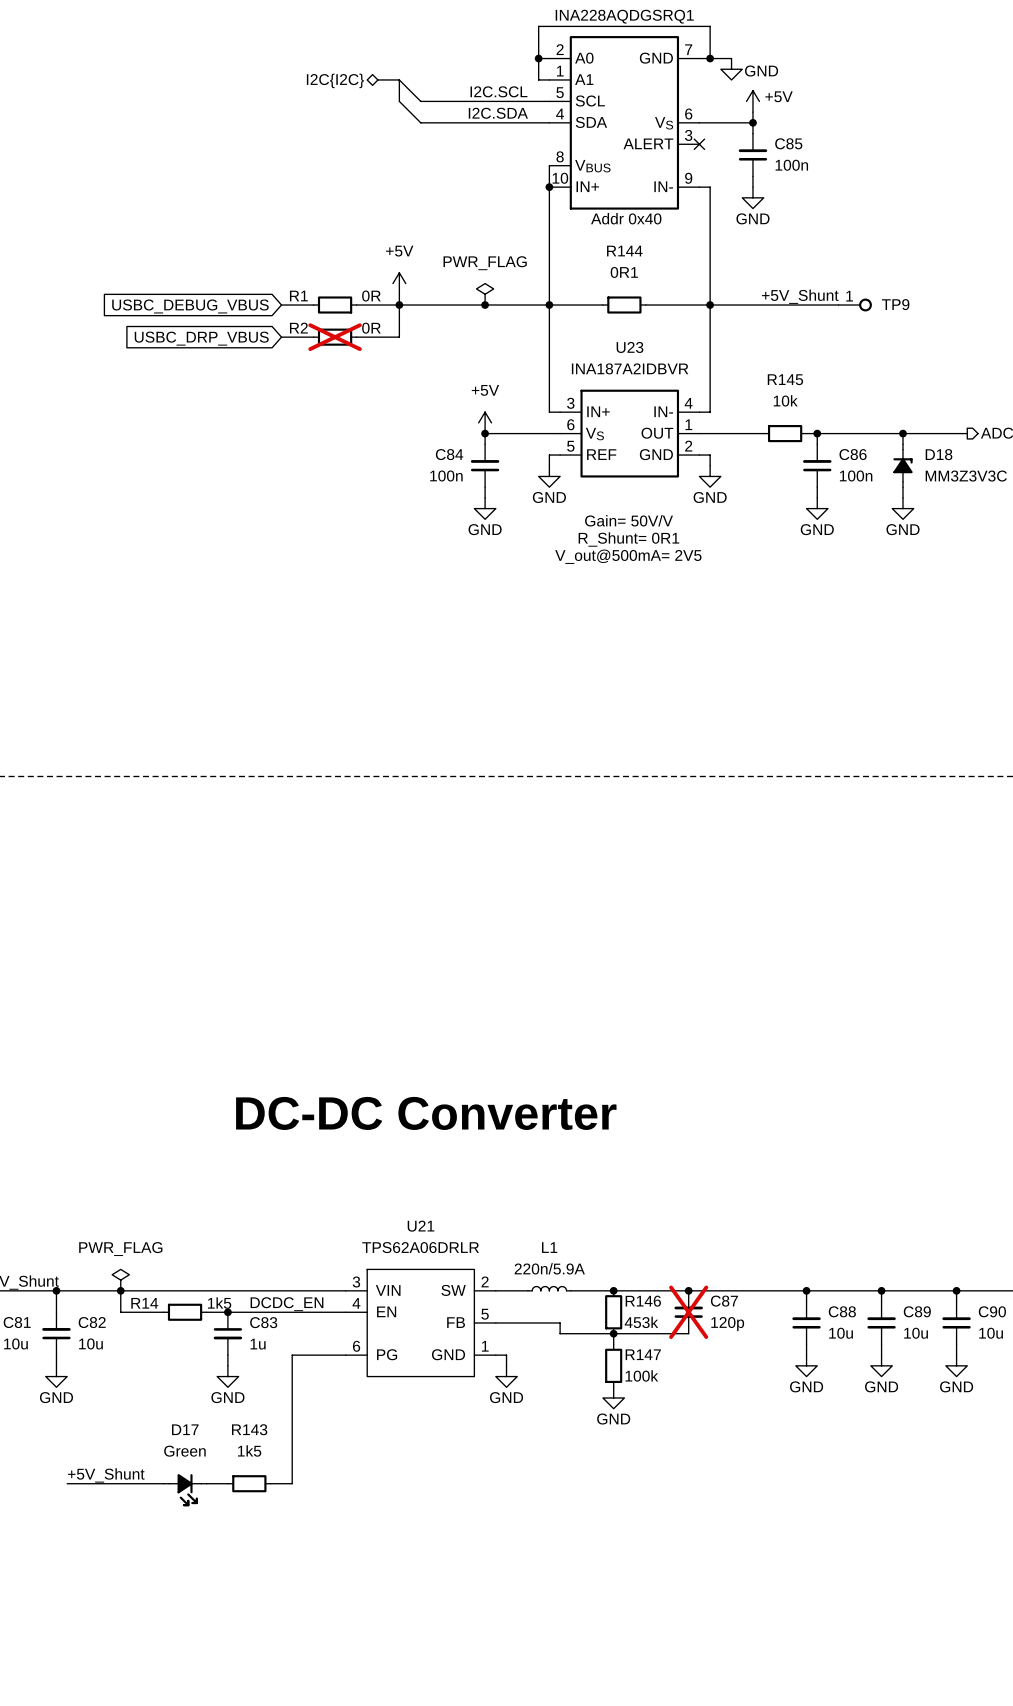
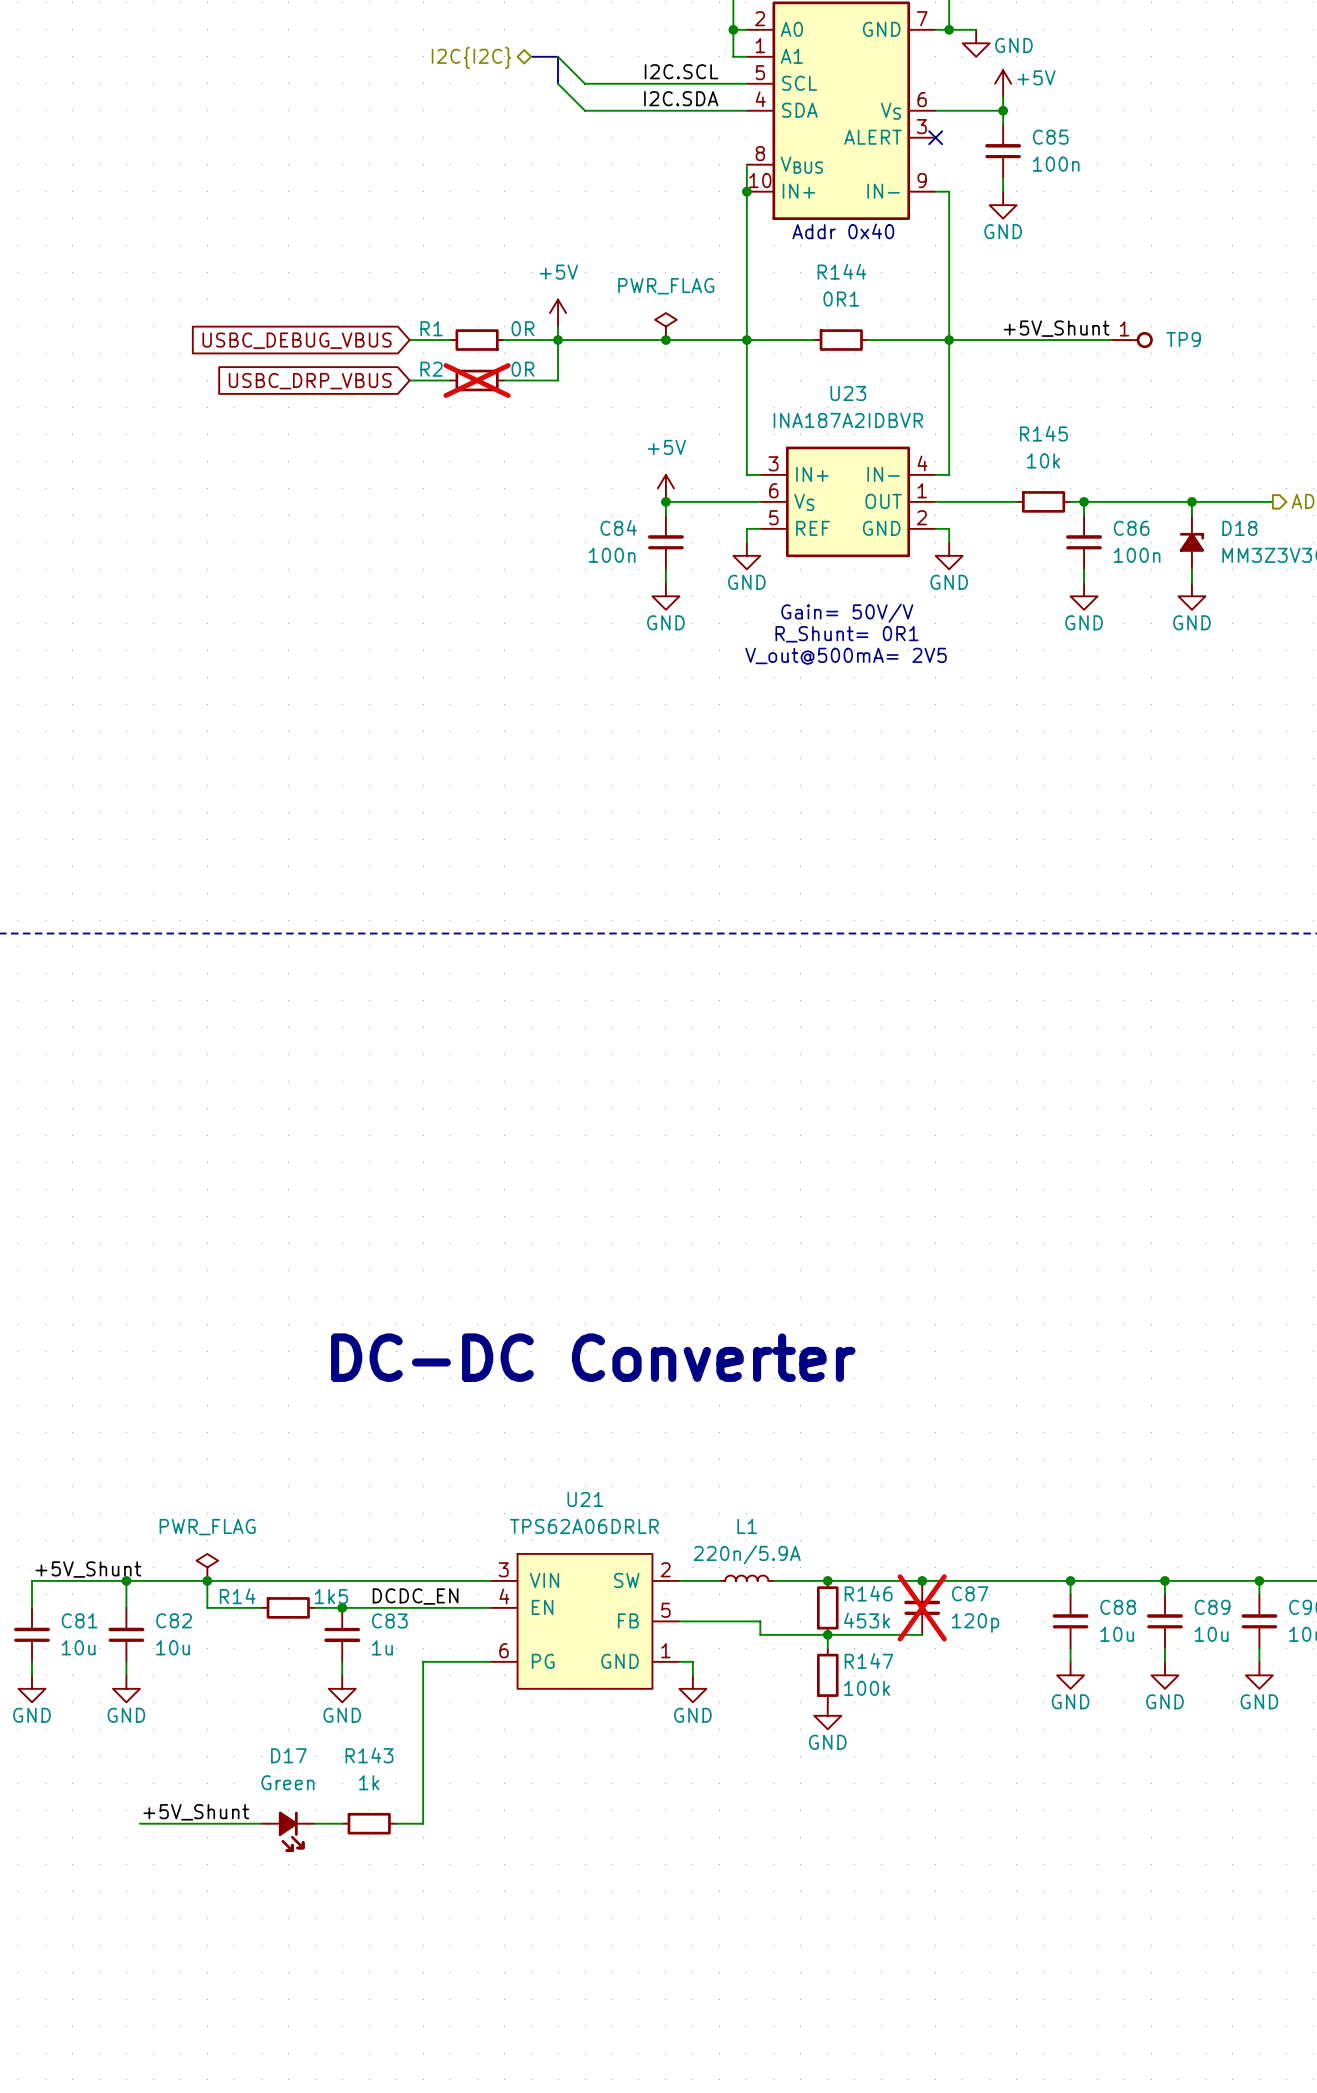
R143 text: 1k5 (249, 1450) -> 1k (369, 1782)

